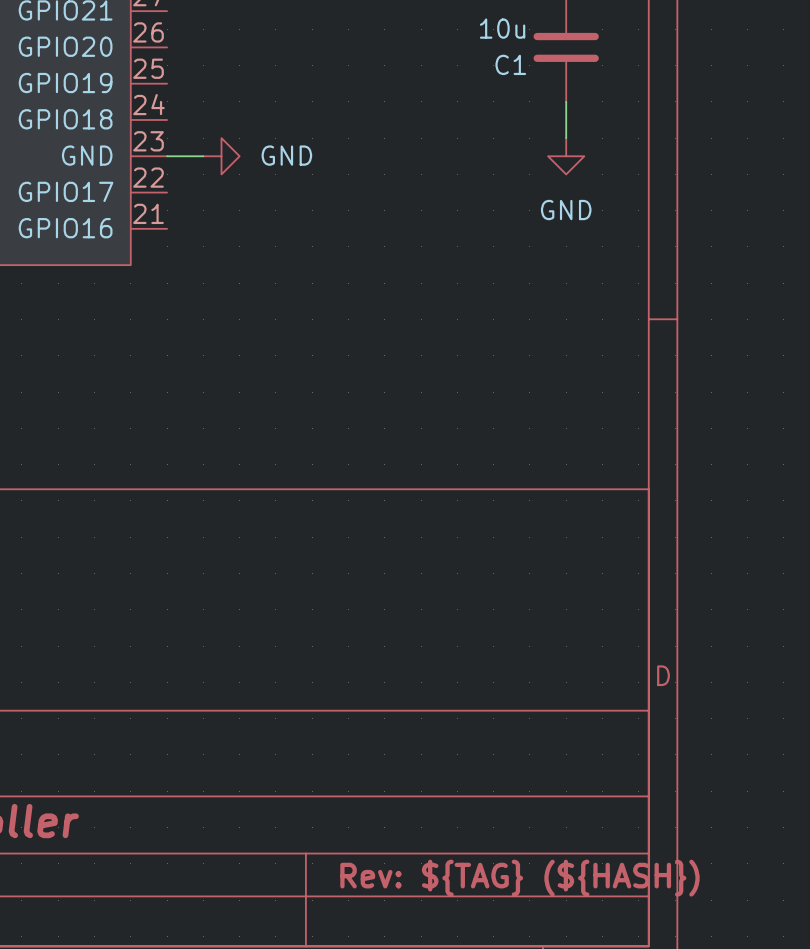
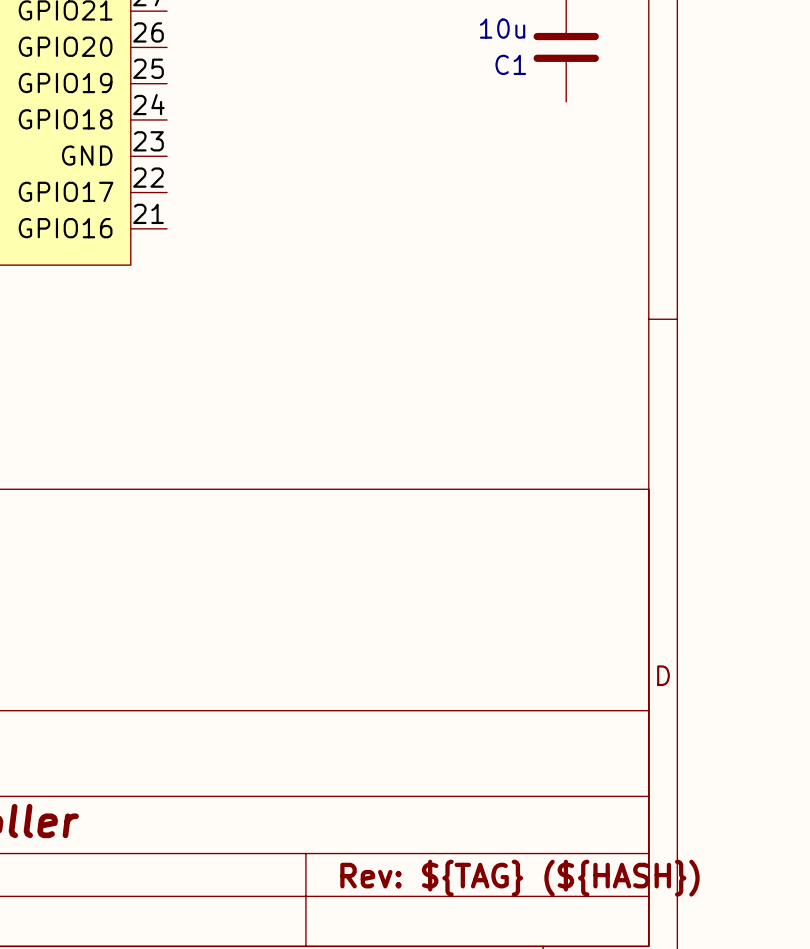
wire: (566, 101) (566, 138) -> none
wire: (167, 156) (203, 156) -> none
power symbol: GND (221, 156) -> none
power symbol: GND (566, 156) -> none

